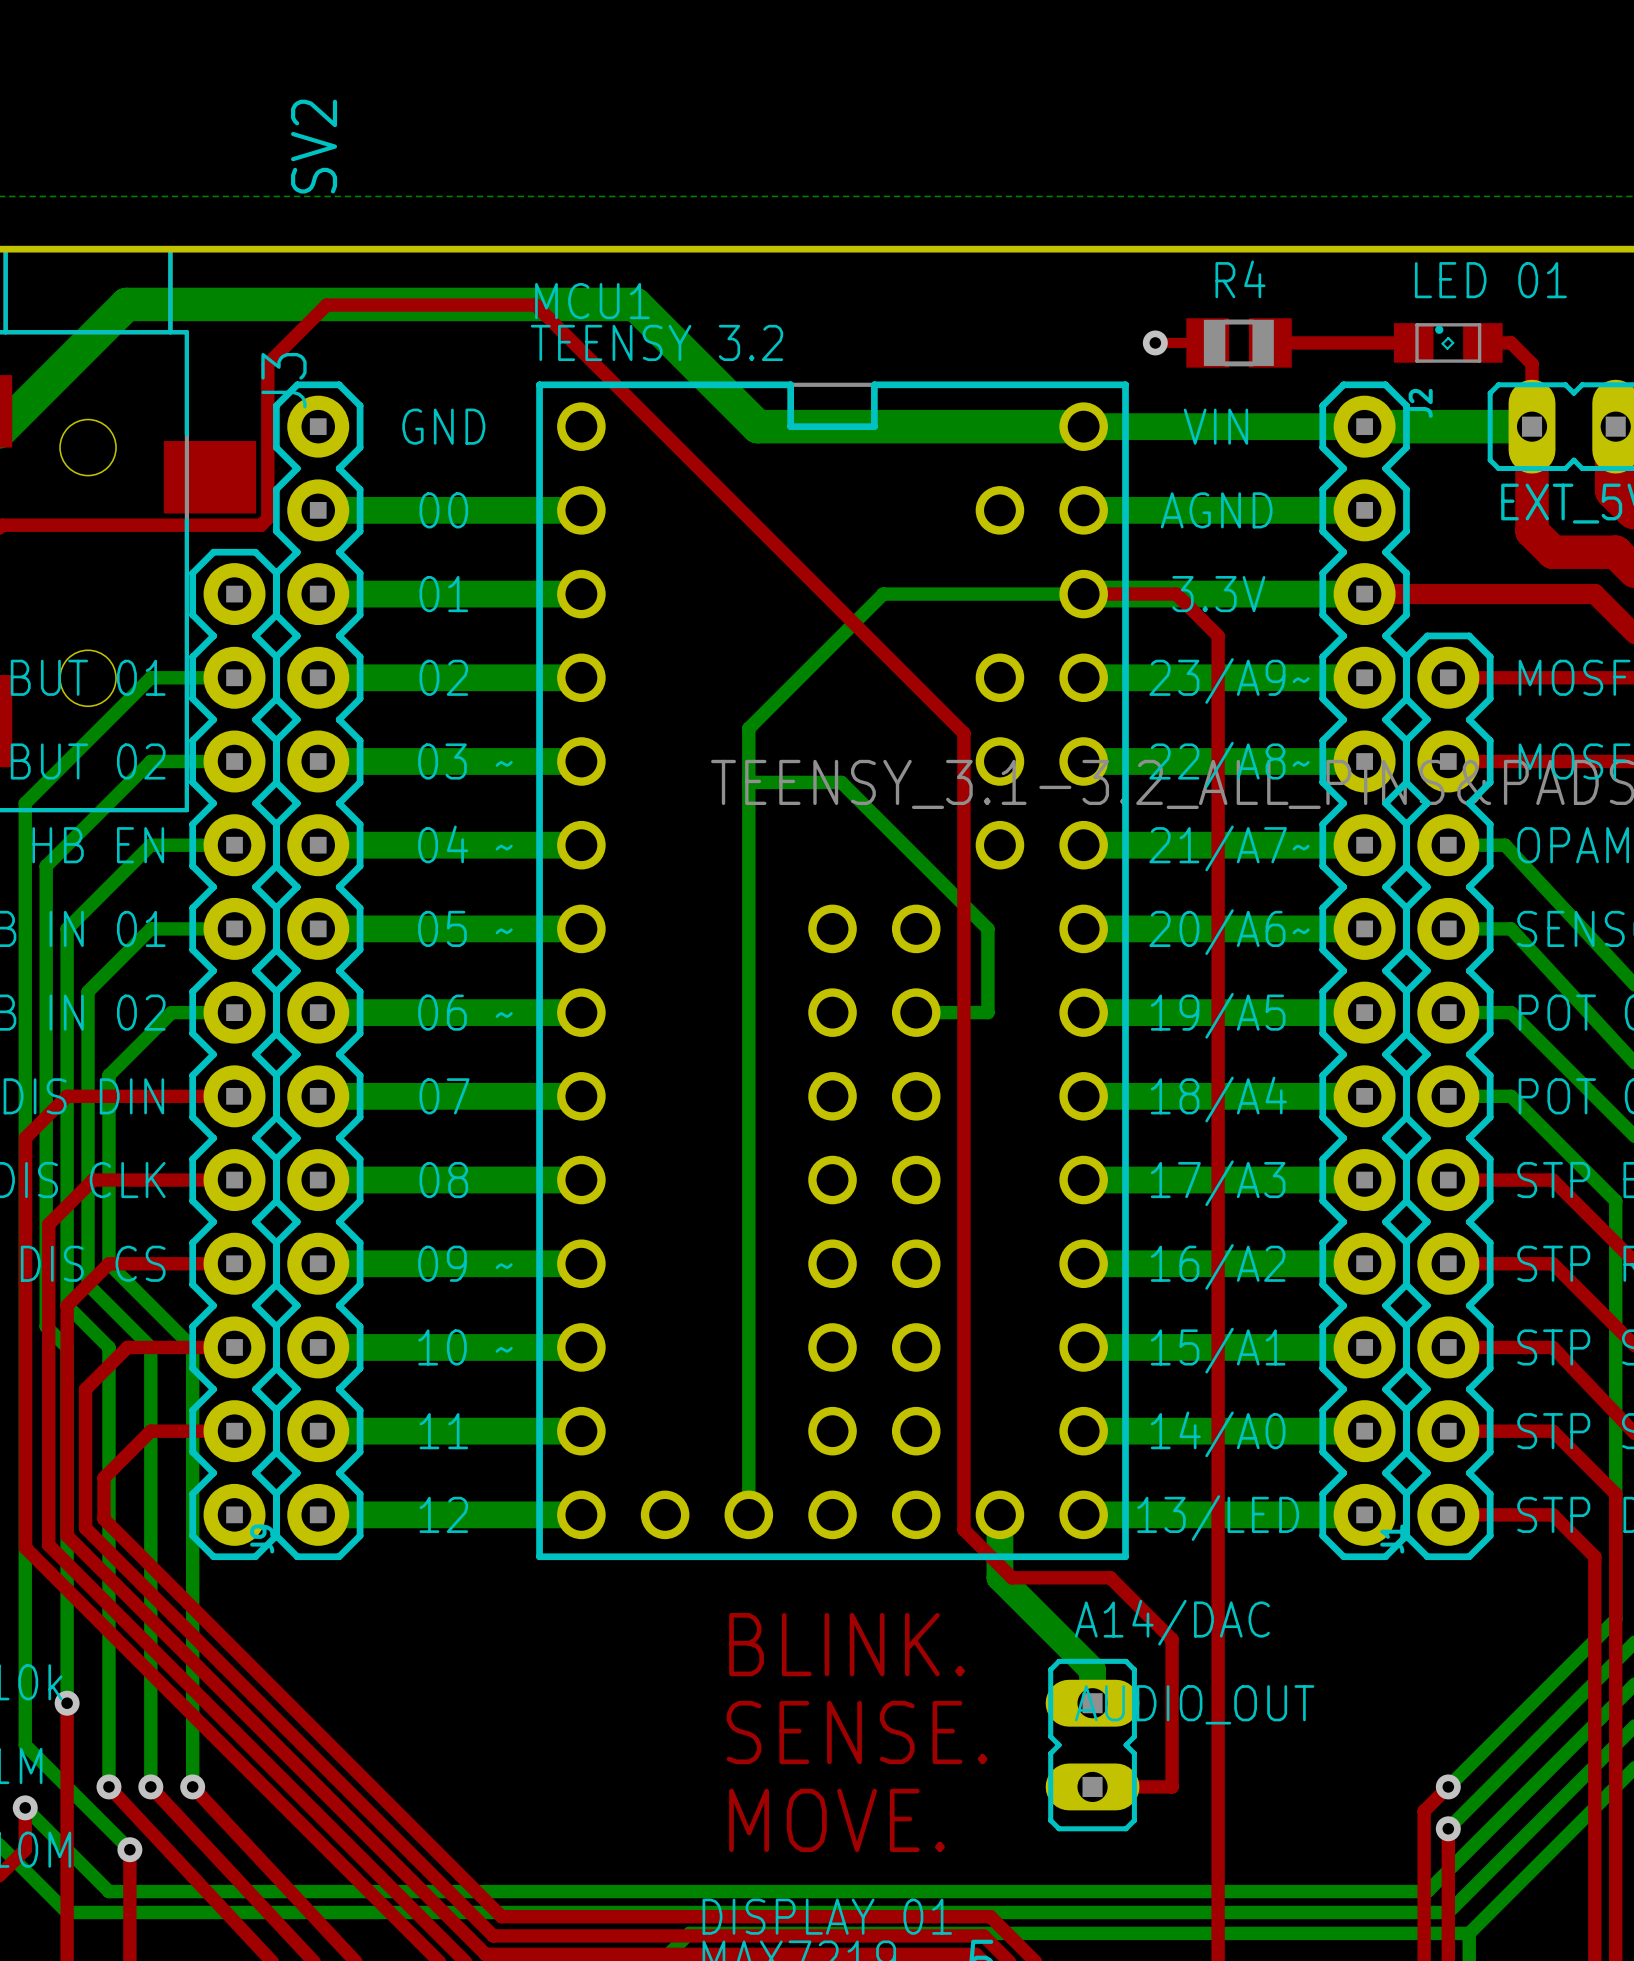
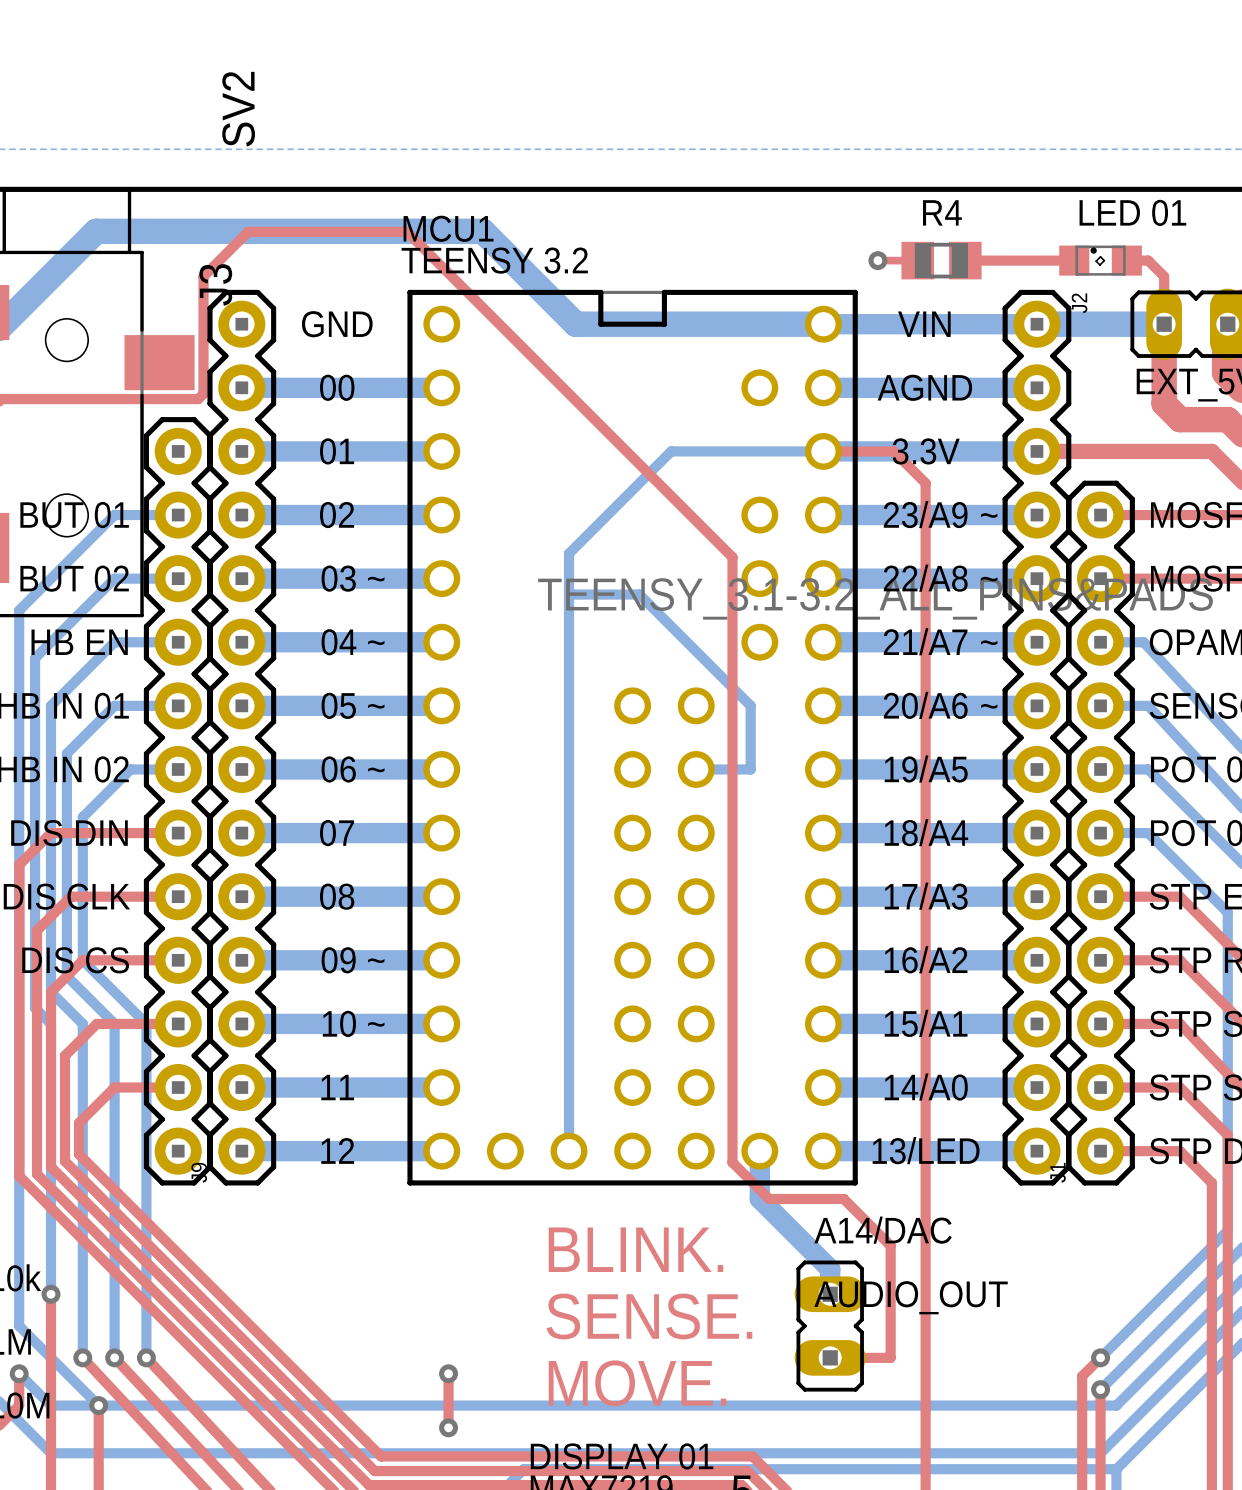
top track: none -> (448, 1373) (448, 1427)
via: none -> (448, 1373)
bottom track: (67, 1849) (108, 1891) (1427, 1891) (1469, 1849) -> (51, 1405) (1116, 1405)
via: none -> (448, 1427)

